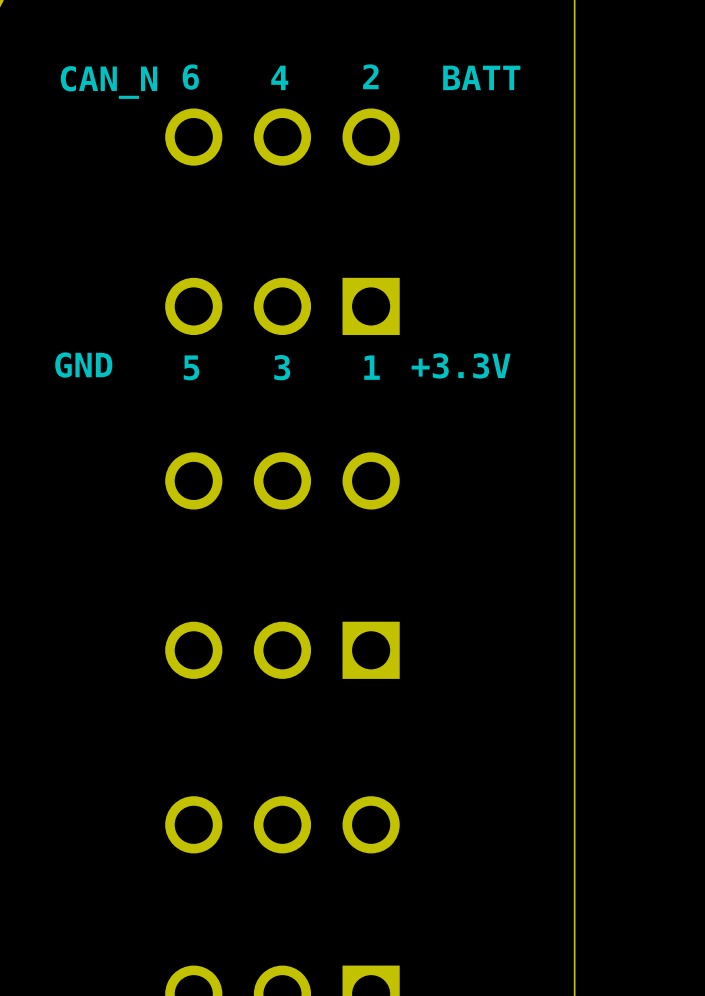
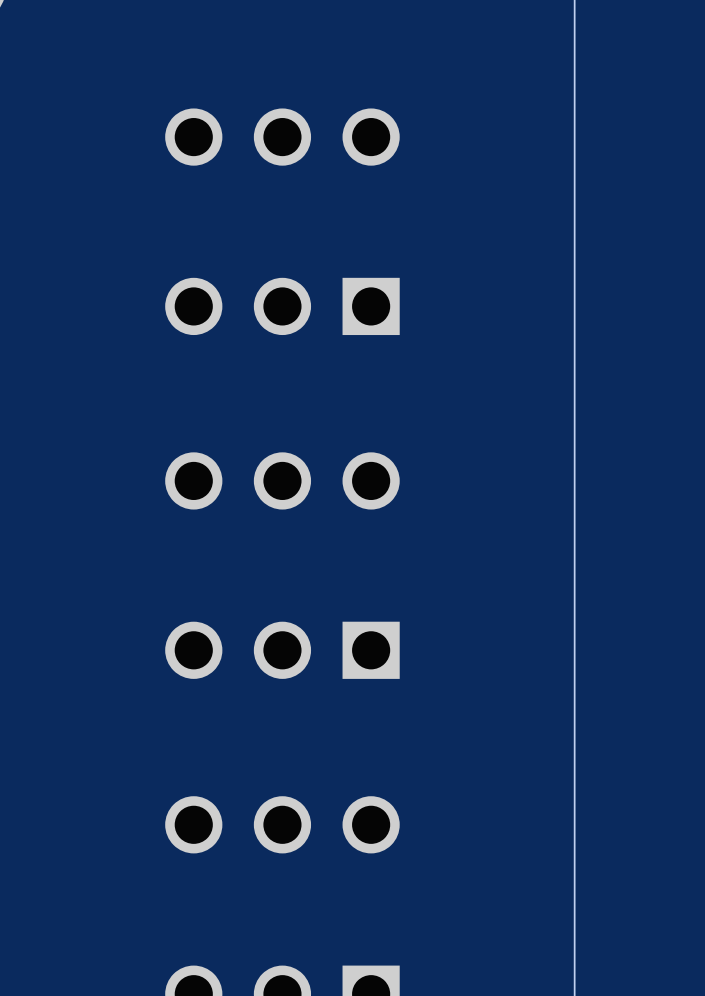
text: 2 (370, 76) -> none
text: 6 (190, 77) -> none
text: 4 (279, 77) -> none
text: BATT (481, 77) -> none
text: CAN_N (109, 82) -> none
text: GND (83, 365) -> none
text: +3.3V (461, 365) -> none
text: 5 (191, 367) -> none
text: 3 (282, 367) -> none
text: 1 (372, 367) -> none

